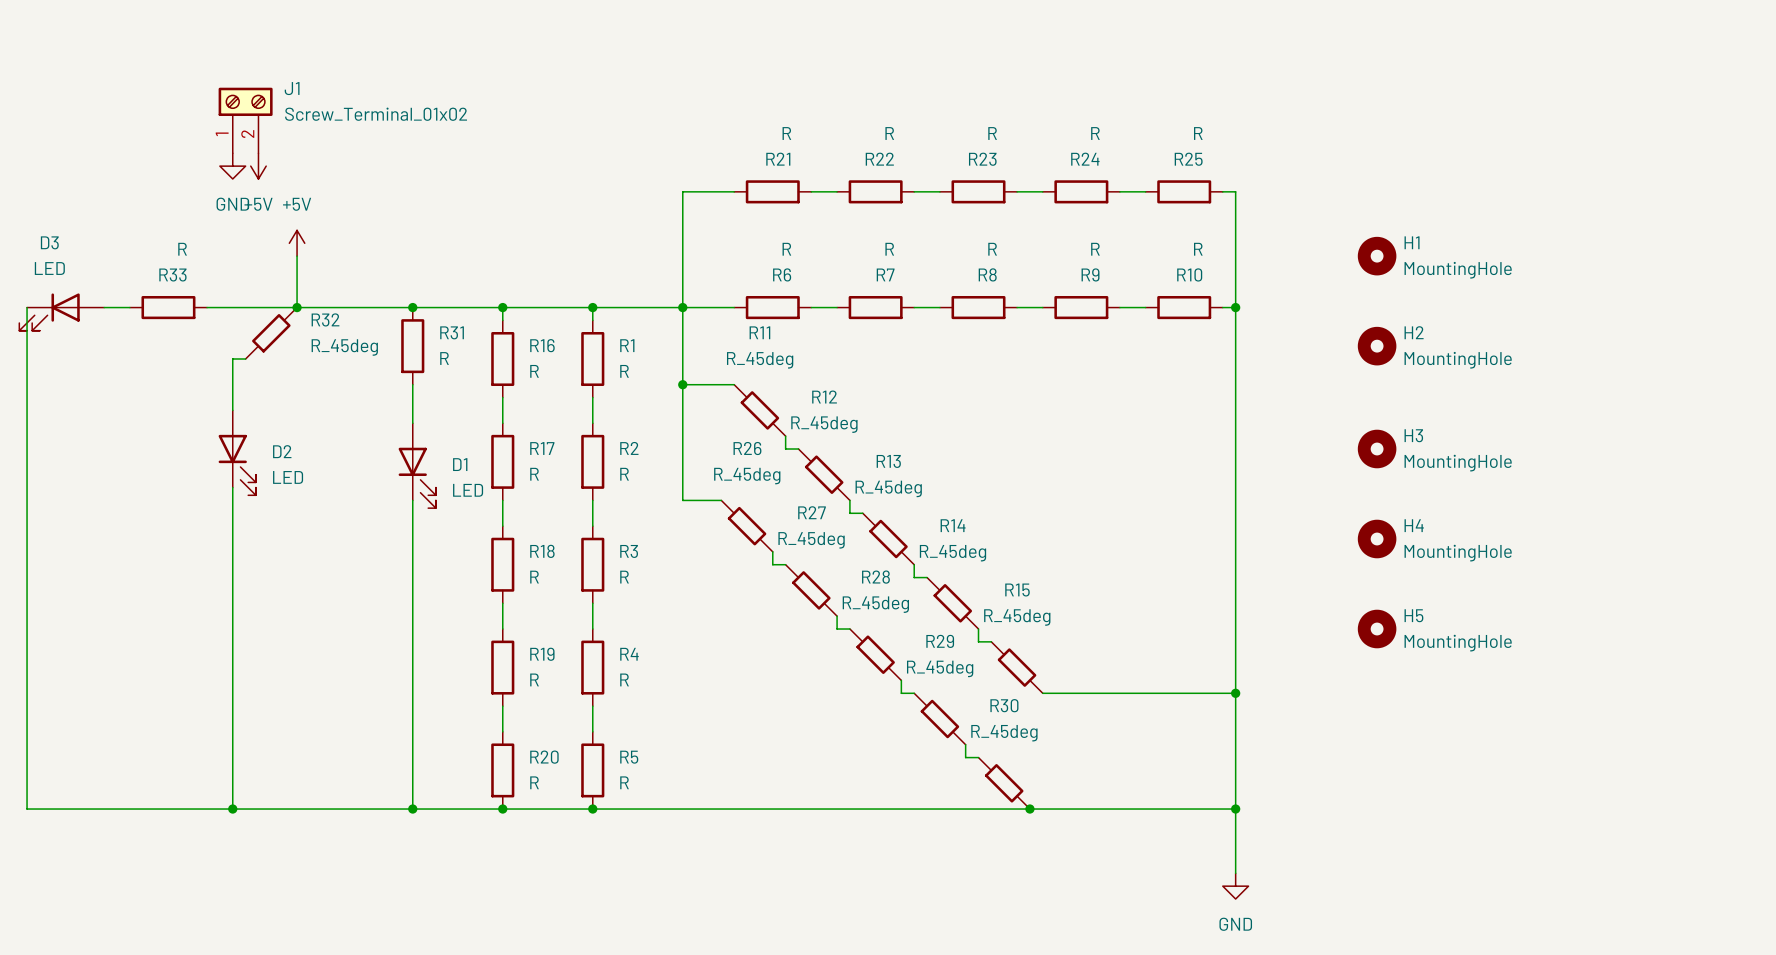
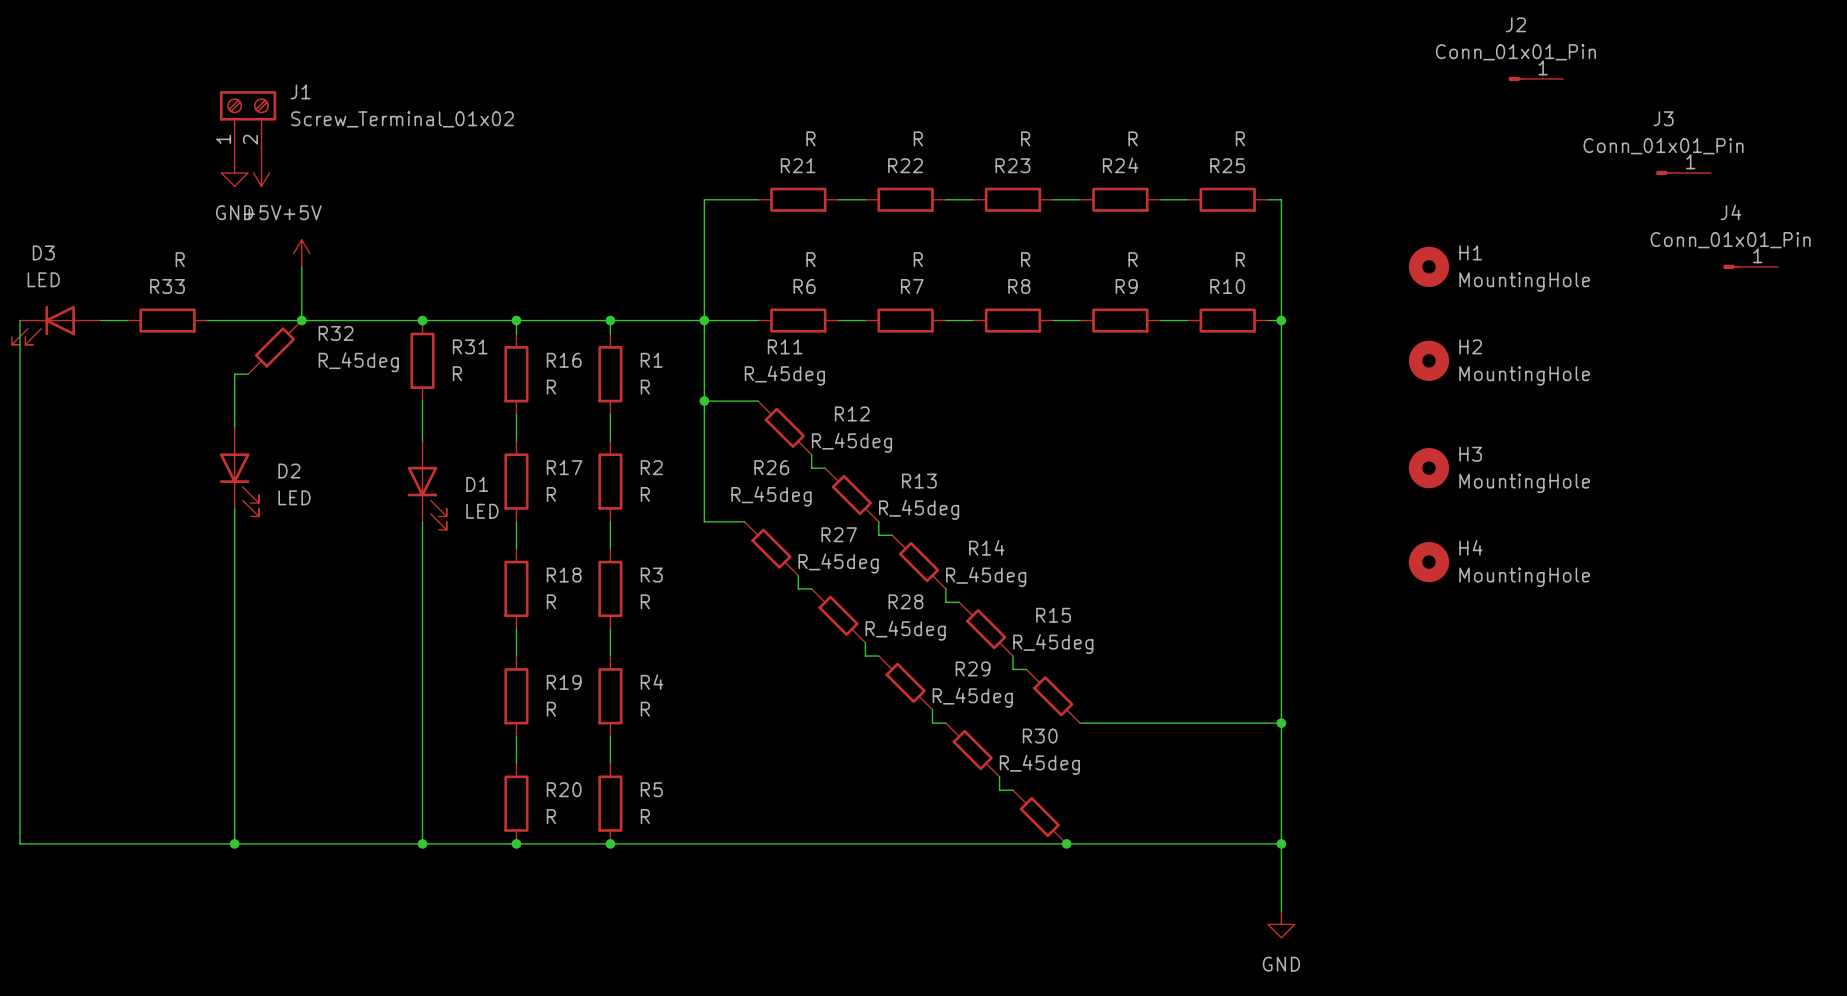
J2: none -> Conn_01x01_Pin (1535, 78)
J3: none -> Conn_01x01_Pin (1683, 172)
J4: none -> Conn_01x01_Pin (1750, 266)
H5: MountingHole (1377, 629) -> none

